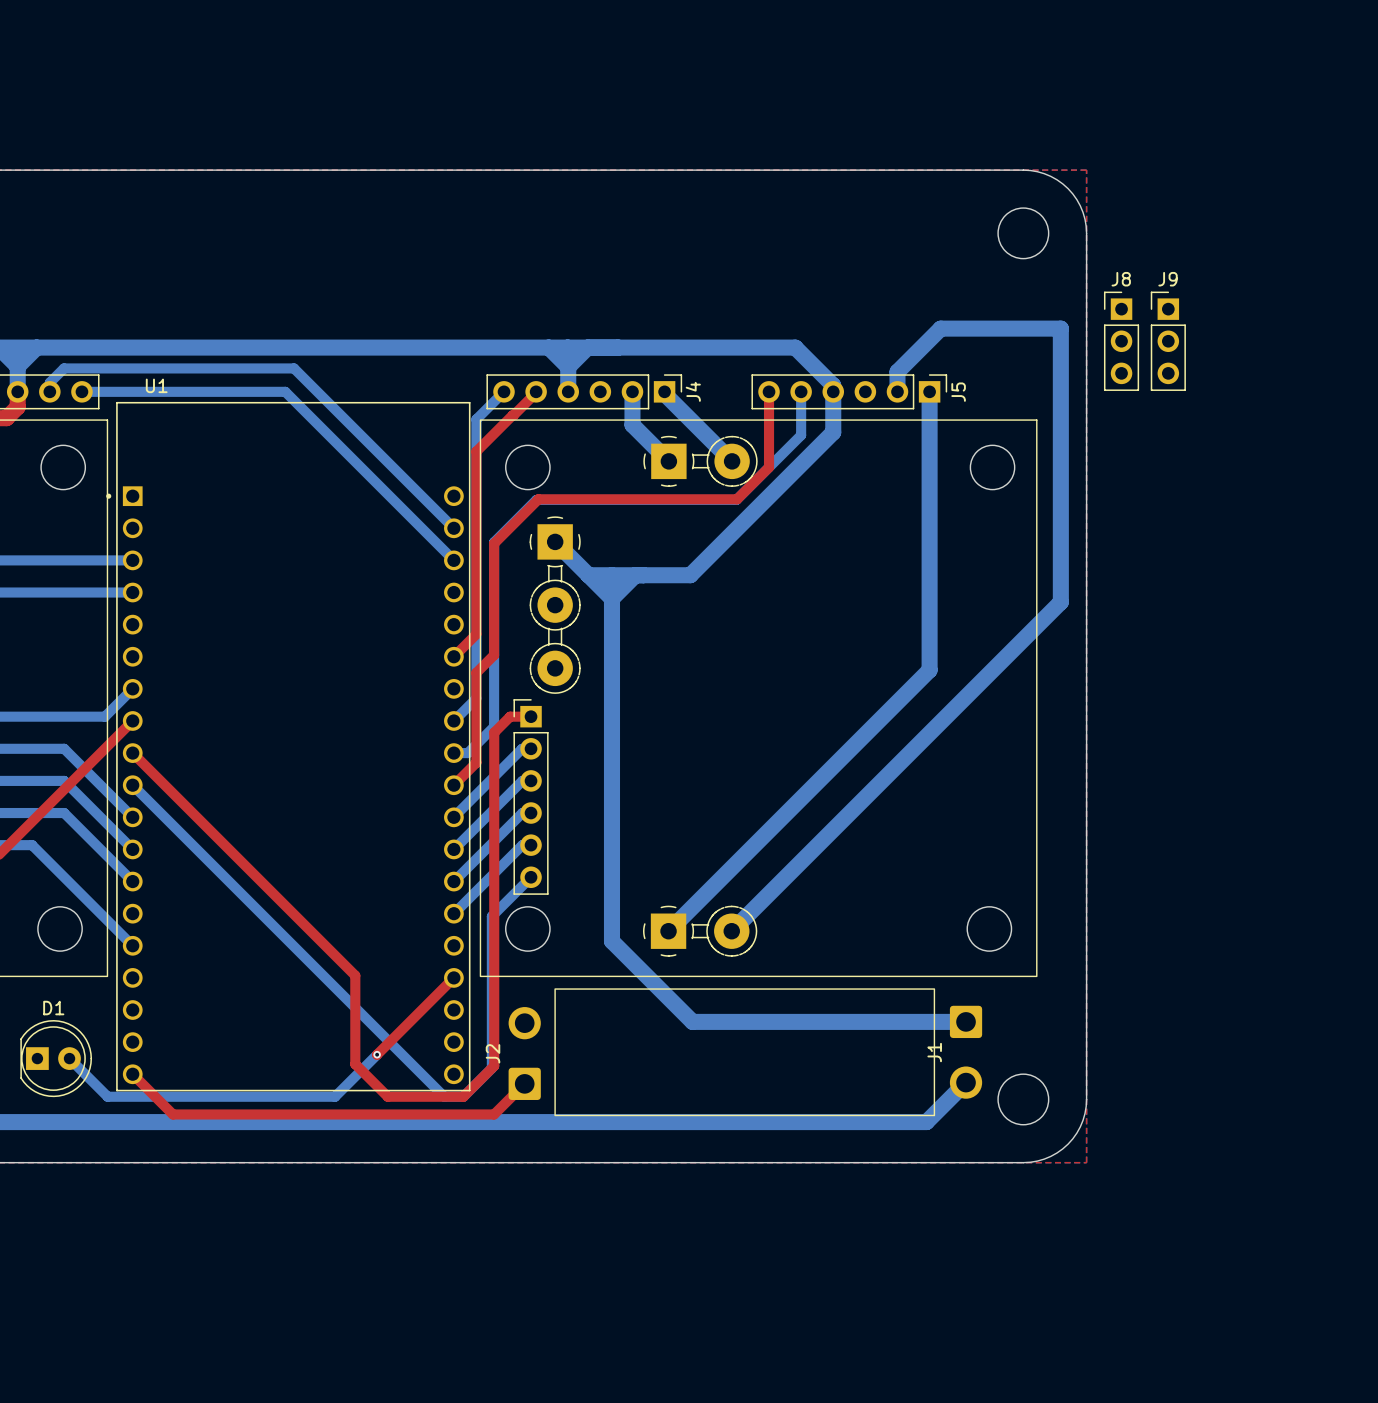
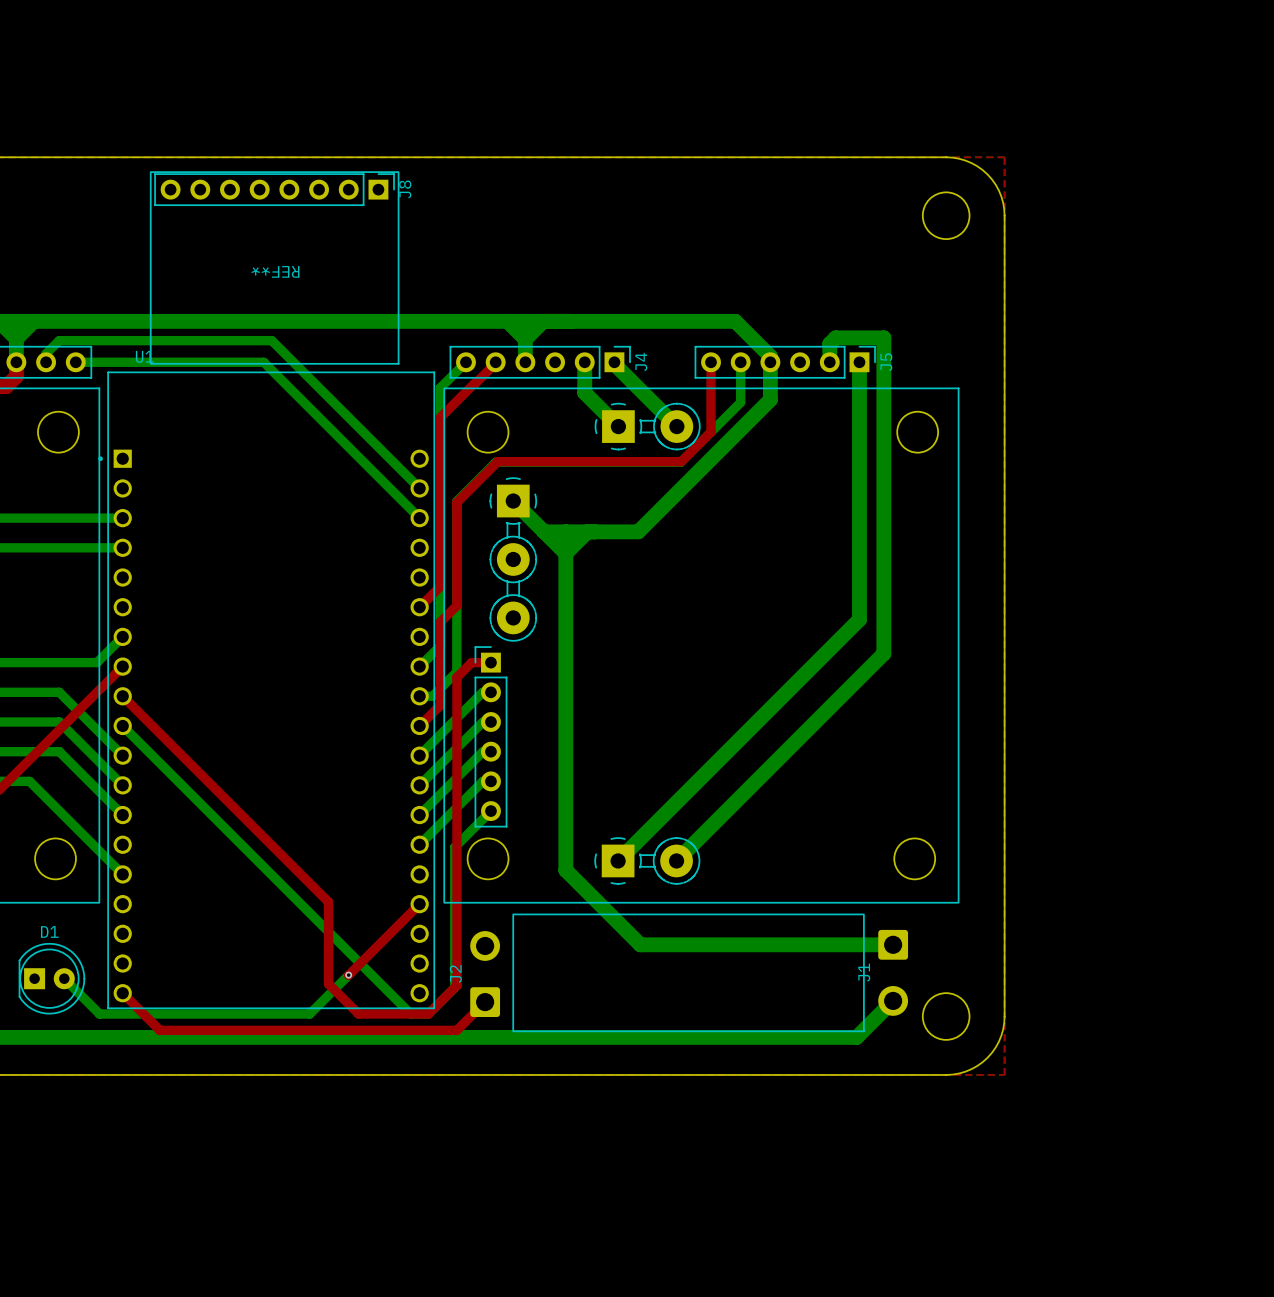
J8 name position: J8 (1121, 279) -> J8 (405, 189)
REF**: none -> (274, 267)
J8 footprint: [1103, 291, 1140, 391] -> [154, 173, 395, 206]
J9: (1168, 341) -> none
bottom track: (903, 365) (940, 328) (1060, 328) (1060, 602) (955, 707) -> (835, 337) (883, 337) (883, 653)

